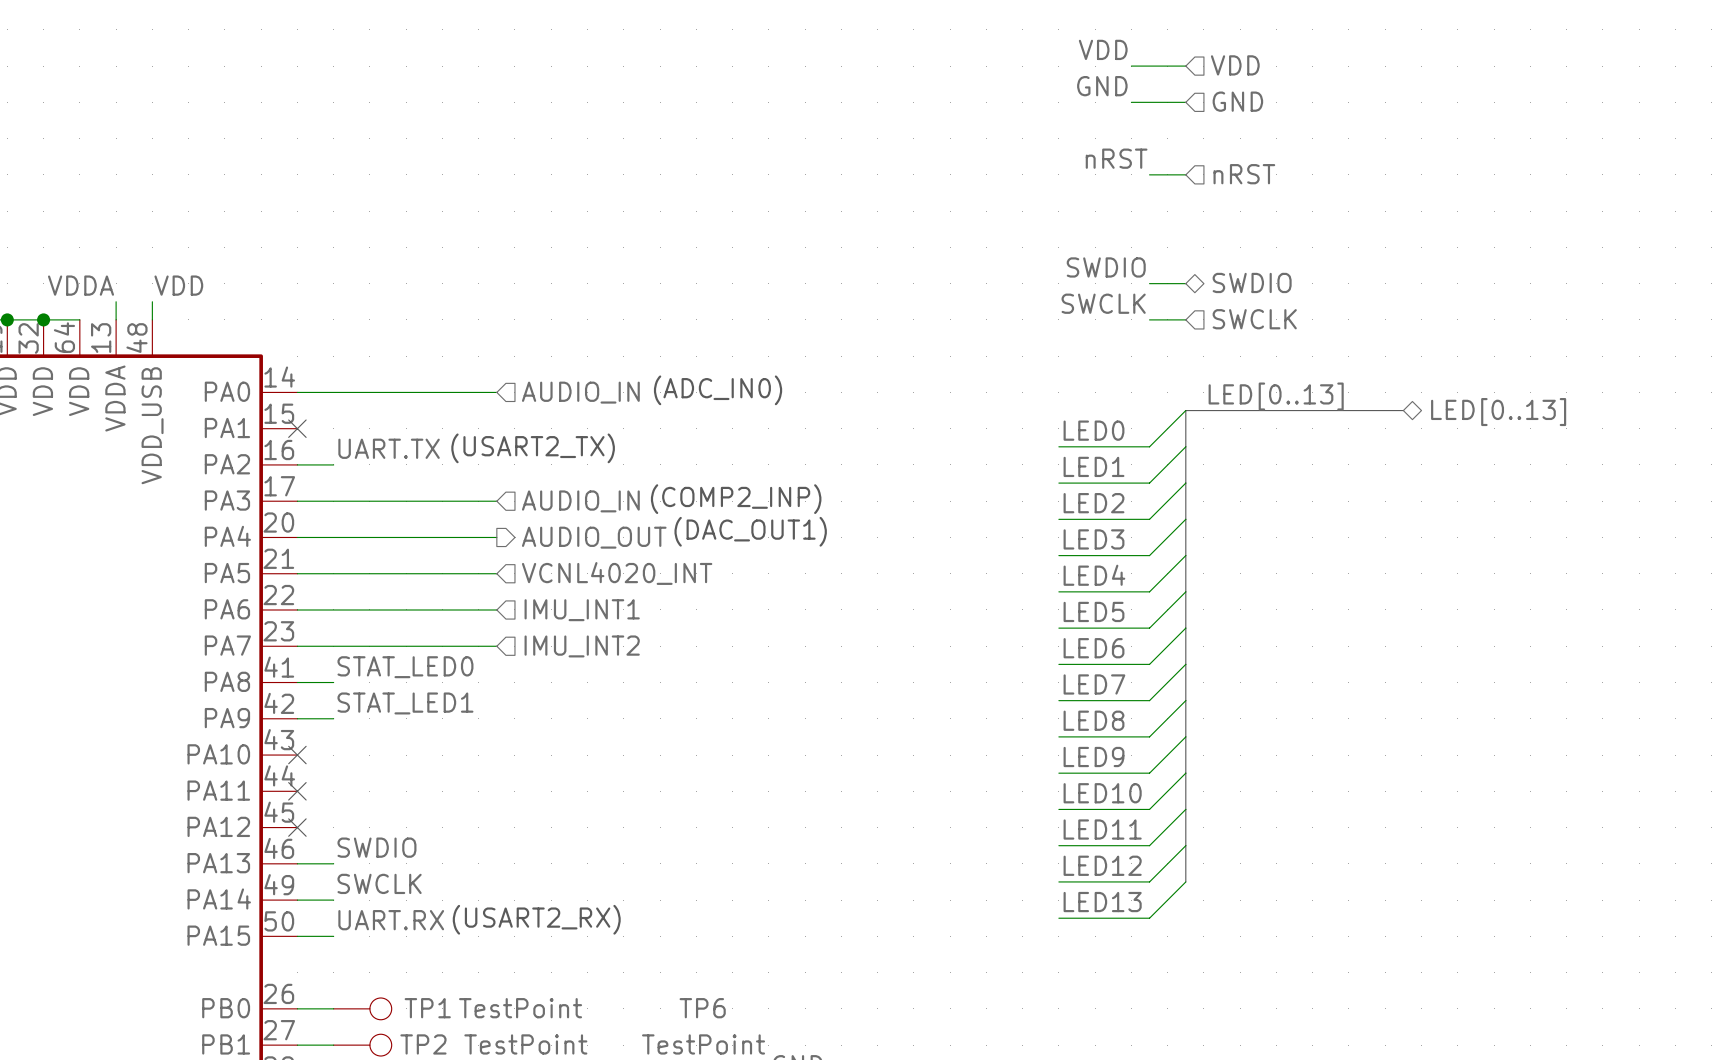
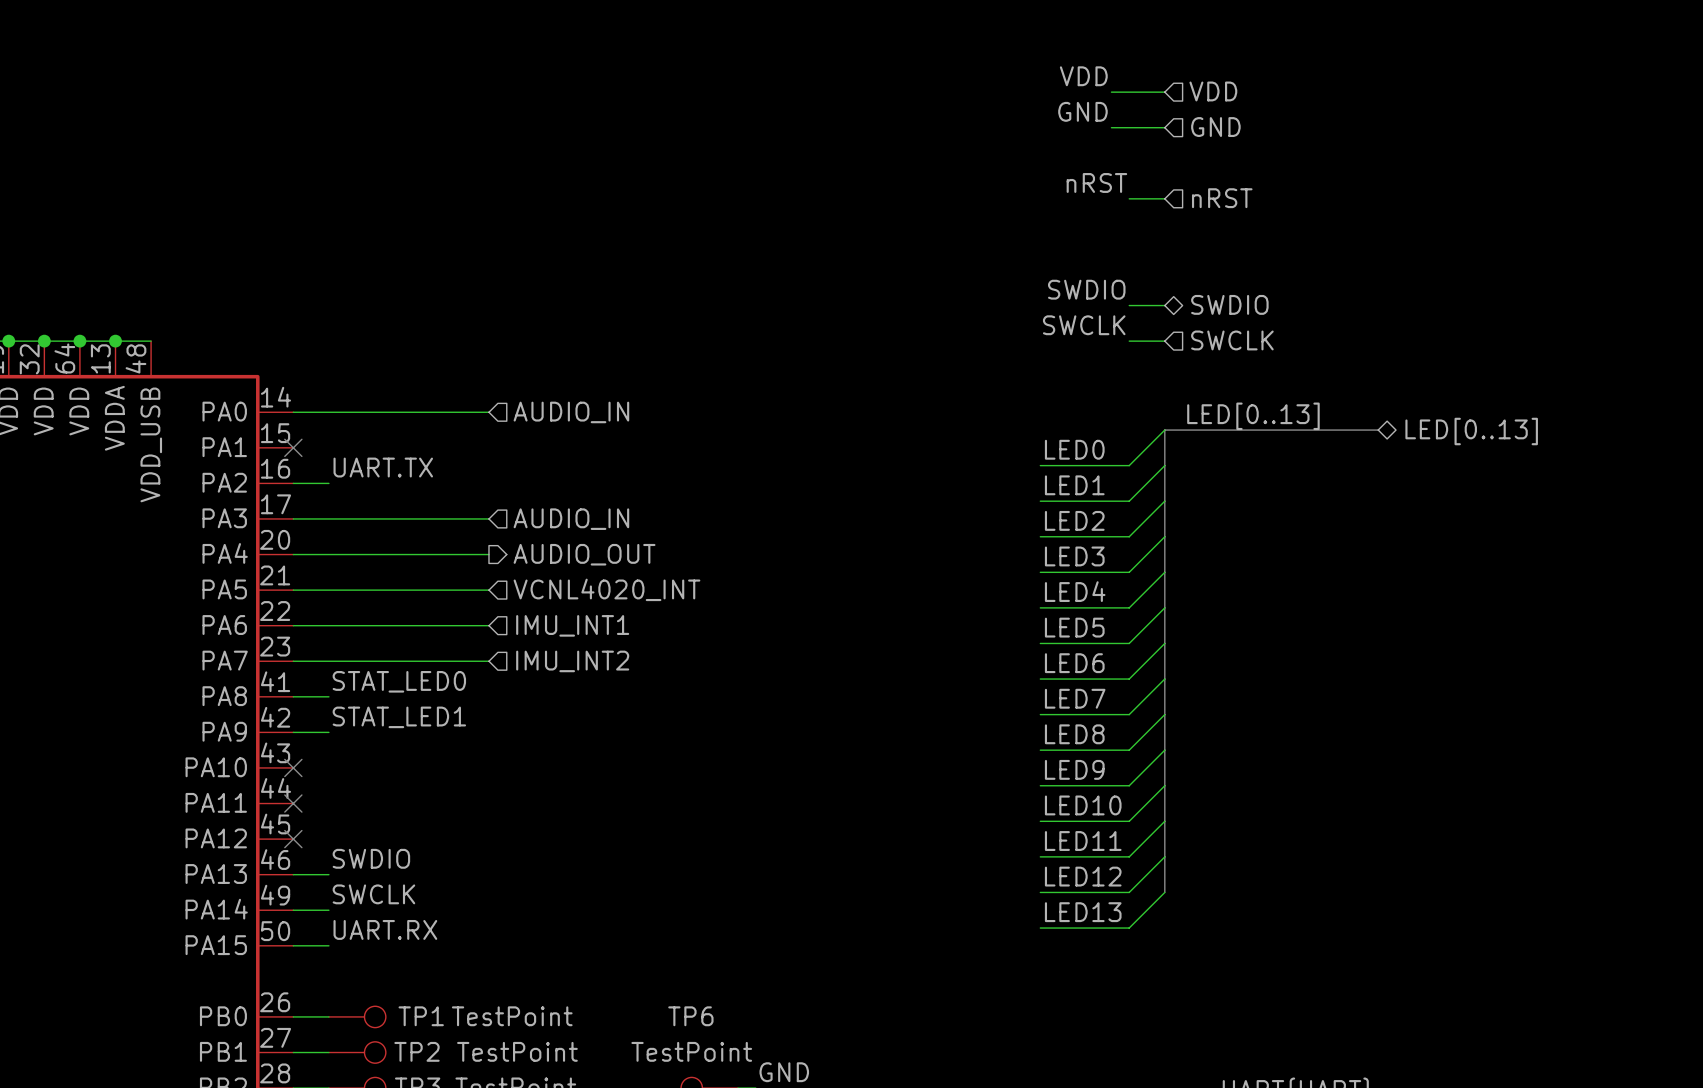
label: VDDA (81, 285) -> none
label: VDD (178, 285) -> none
wire: (116, 301) (116, 319) -> none
wire: (152, 301) (152, 319) -> (79, 341) (151, 341)
junction: none -> (79, 341)
junction: none -> (115, 341)
text: (ADC_IN0) (718, 390) -> none
text: (USART2_TX) (533, 448) -> none
text: (COMP2_INP) (736, 499) -> none
text: (DAC_OUT1) (750, 531) -> none
text: (USART2_RX) (536, 919) -> none

